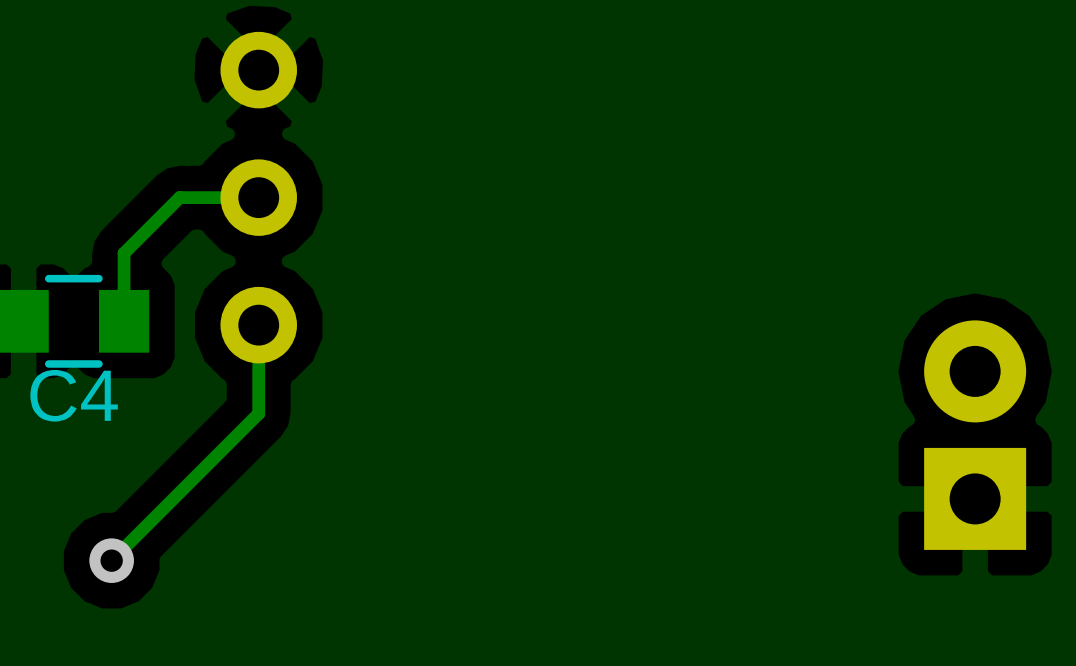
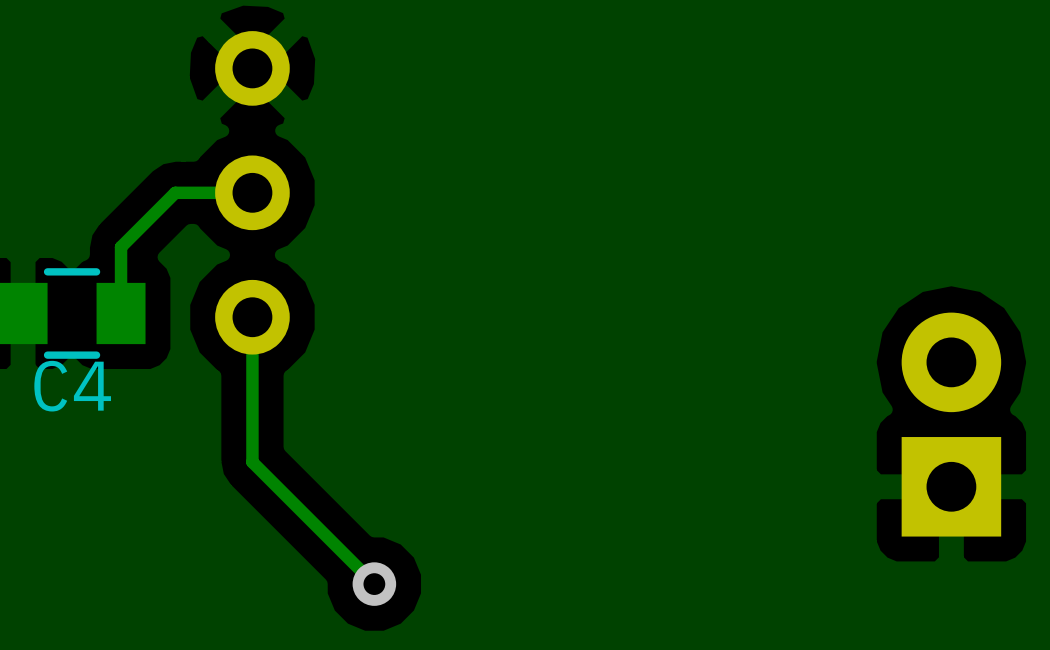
track: (258, 413) (111, 560) -> (252, 403) (252, 462) (374, 584)
via position: (111, 560) -> (374, 584)

